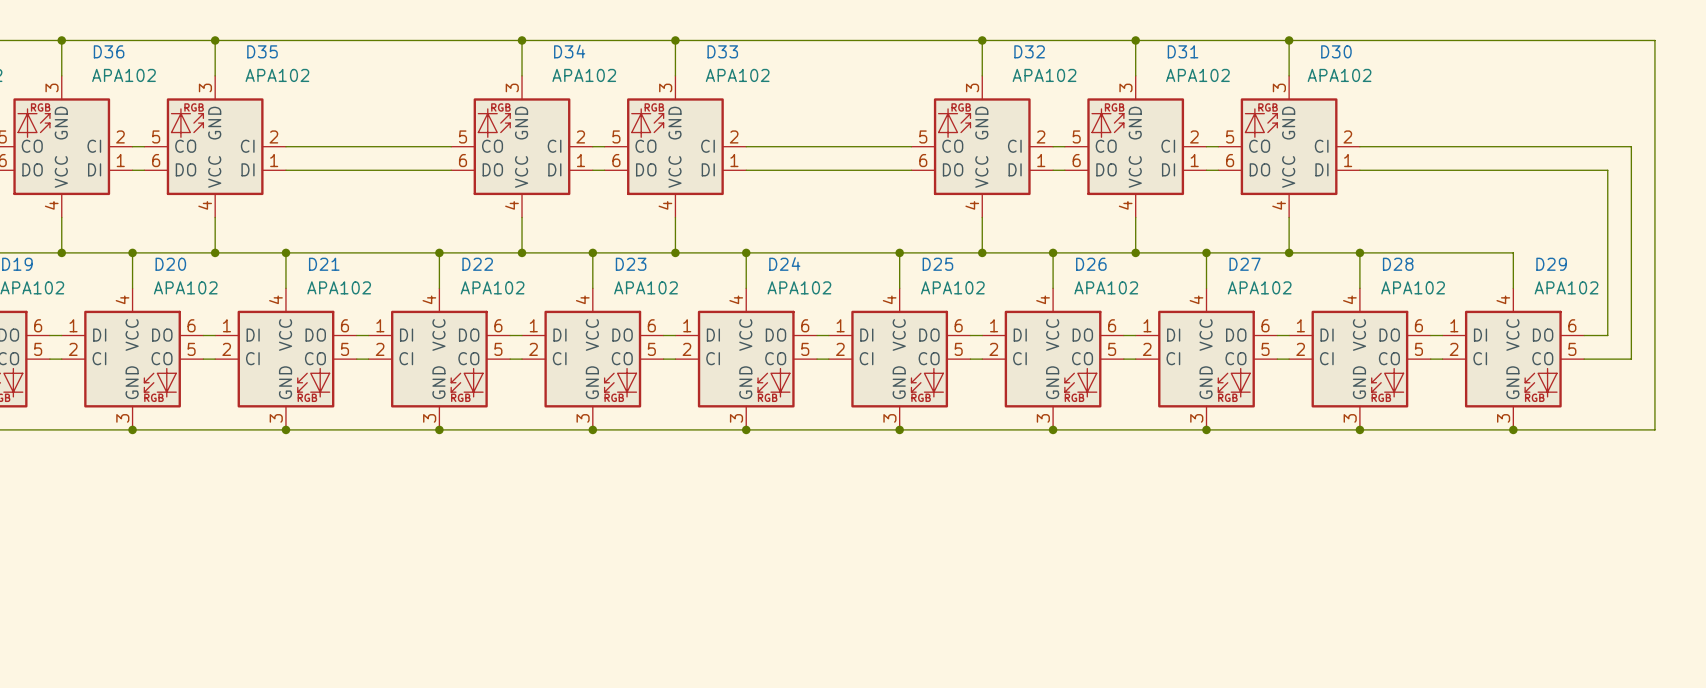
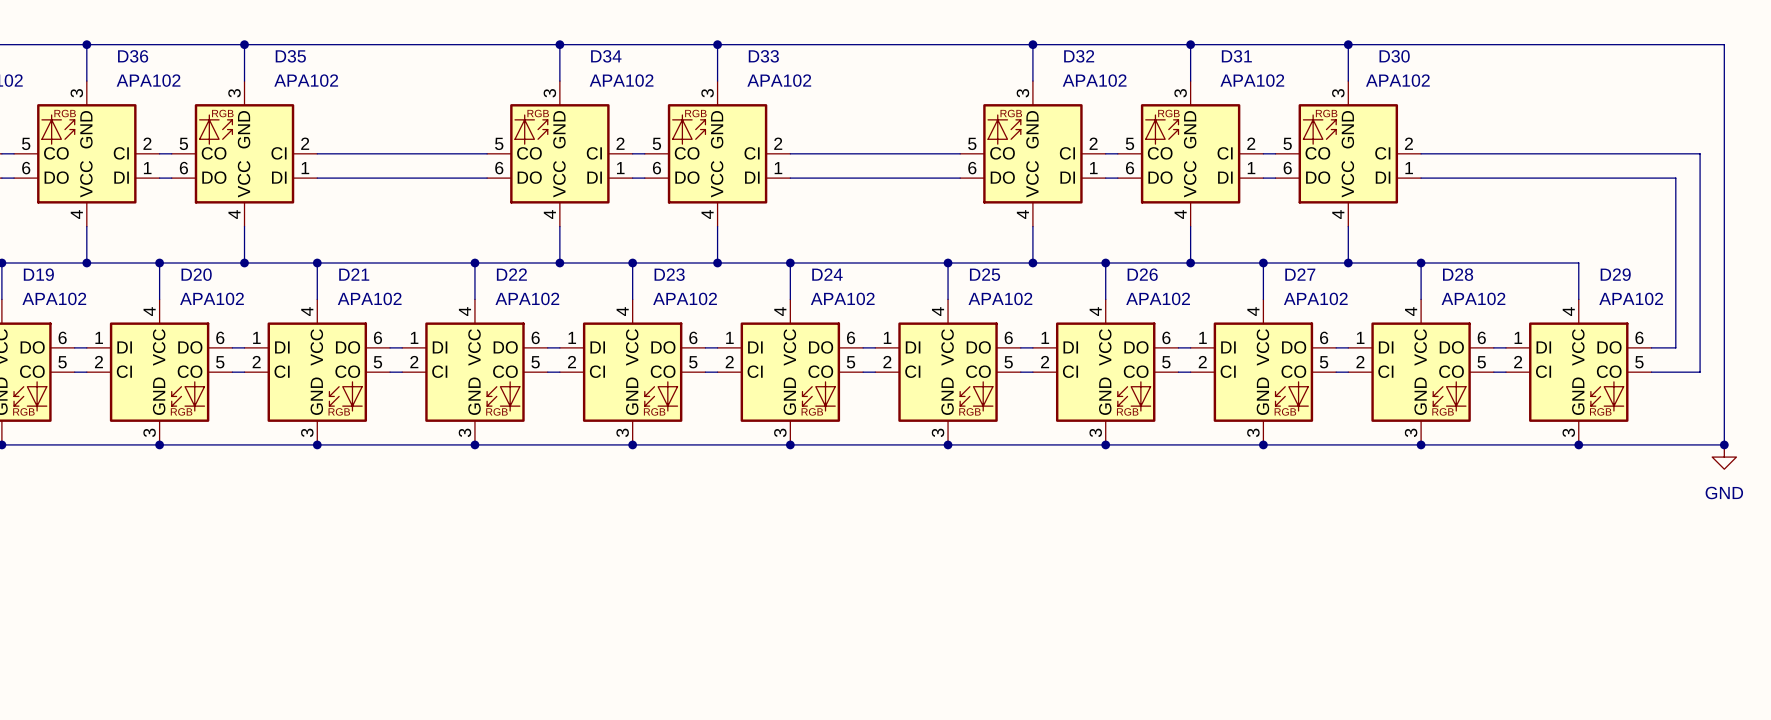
junction: none -> (1724, 444)
power symbol: none -> GND (1724, 457)

